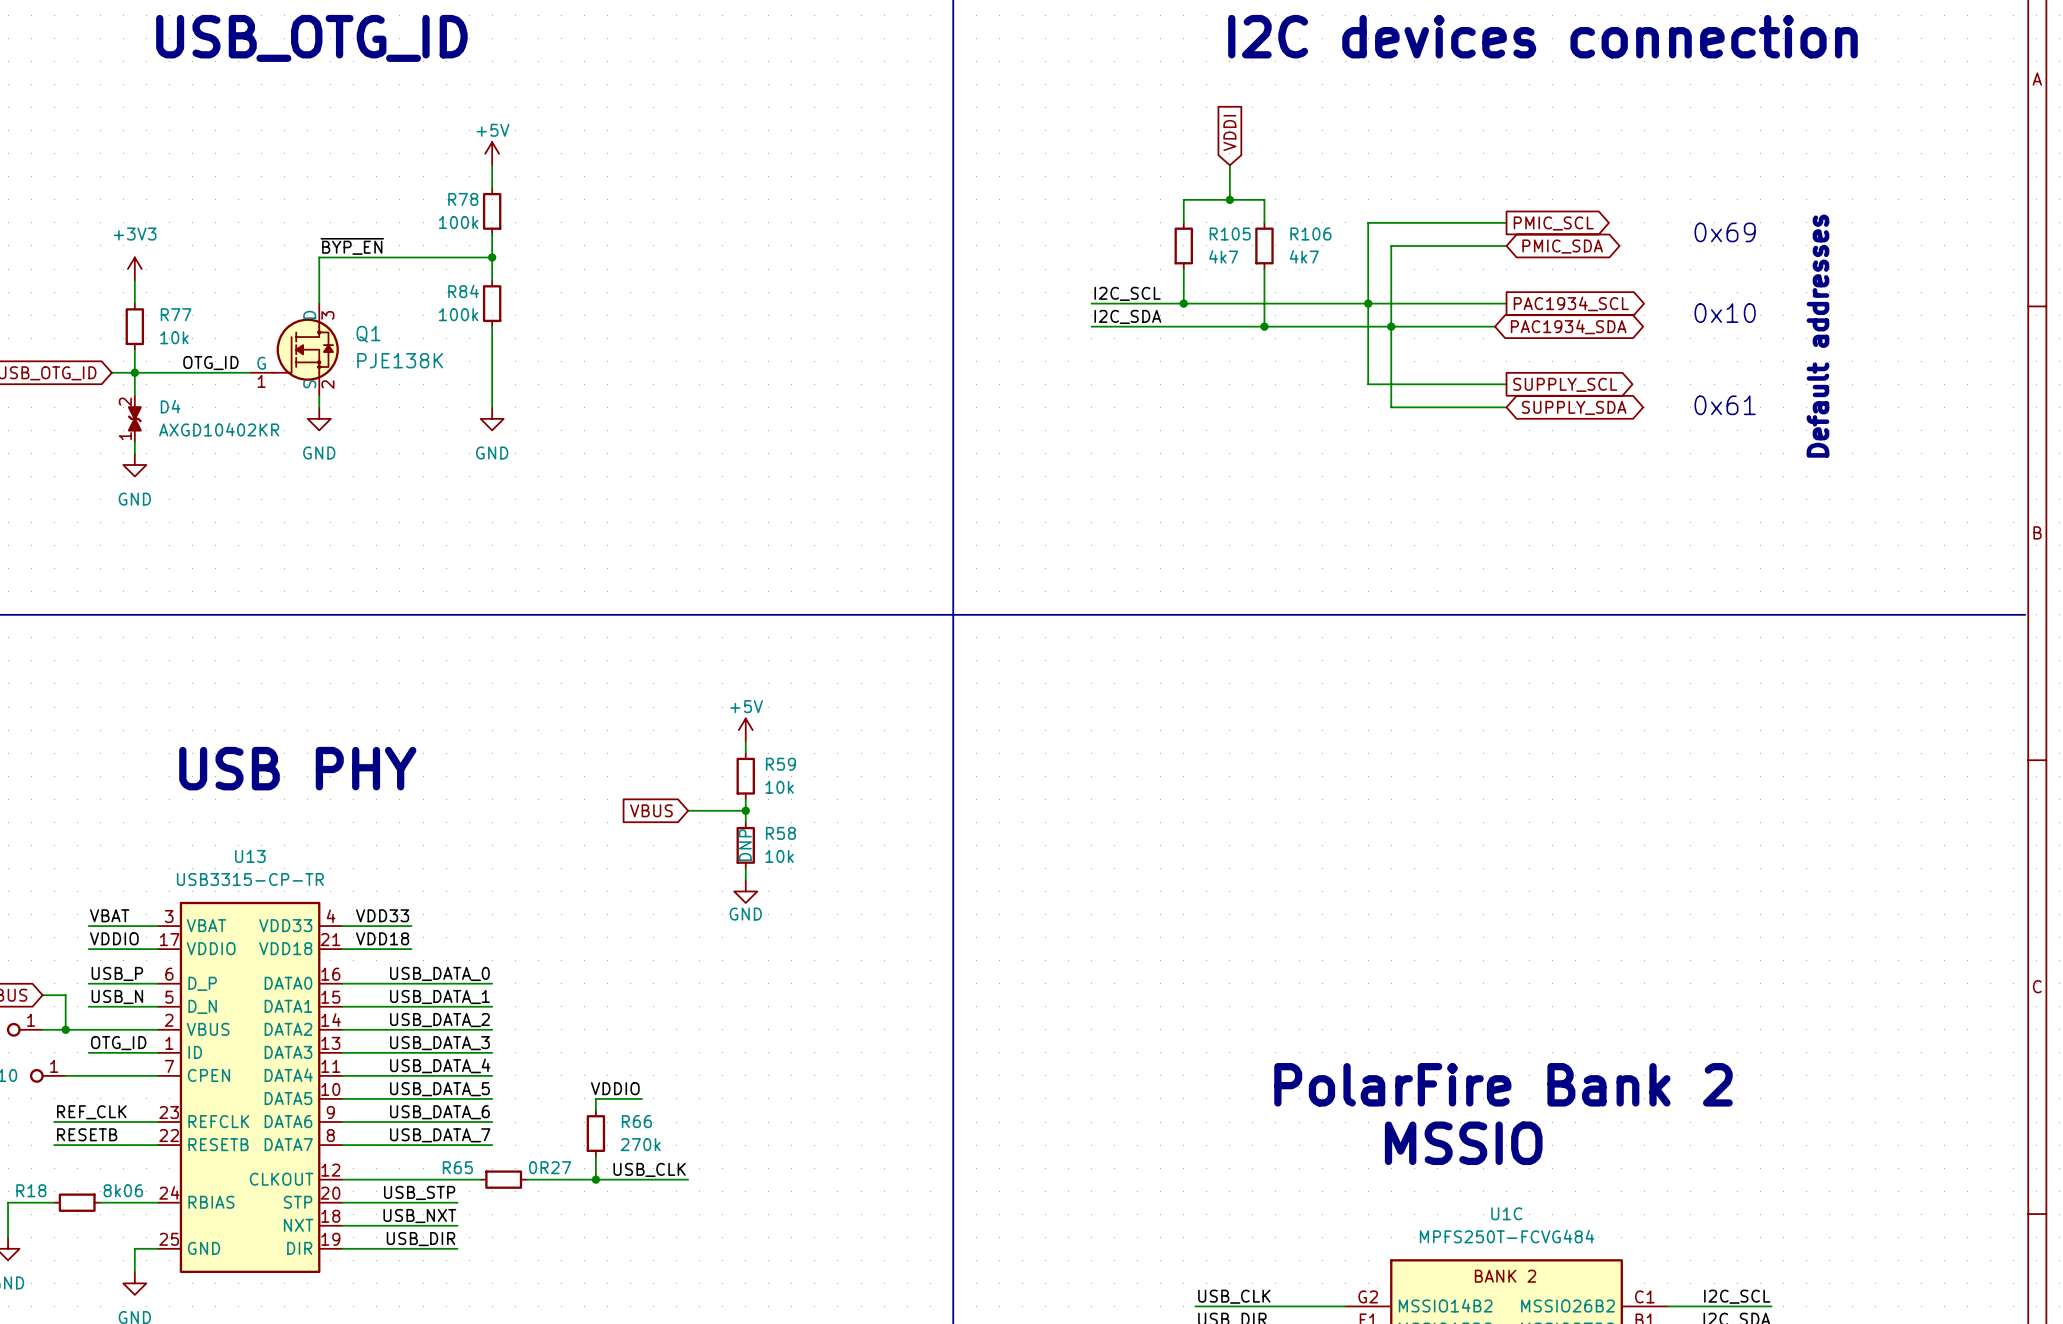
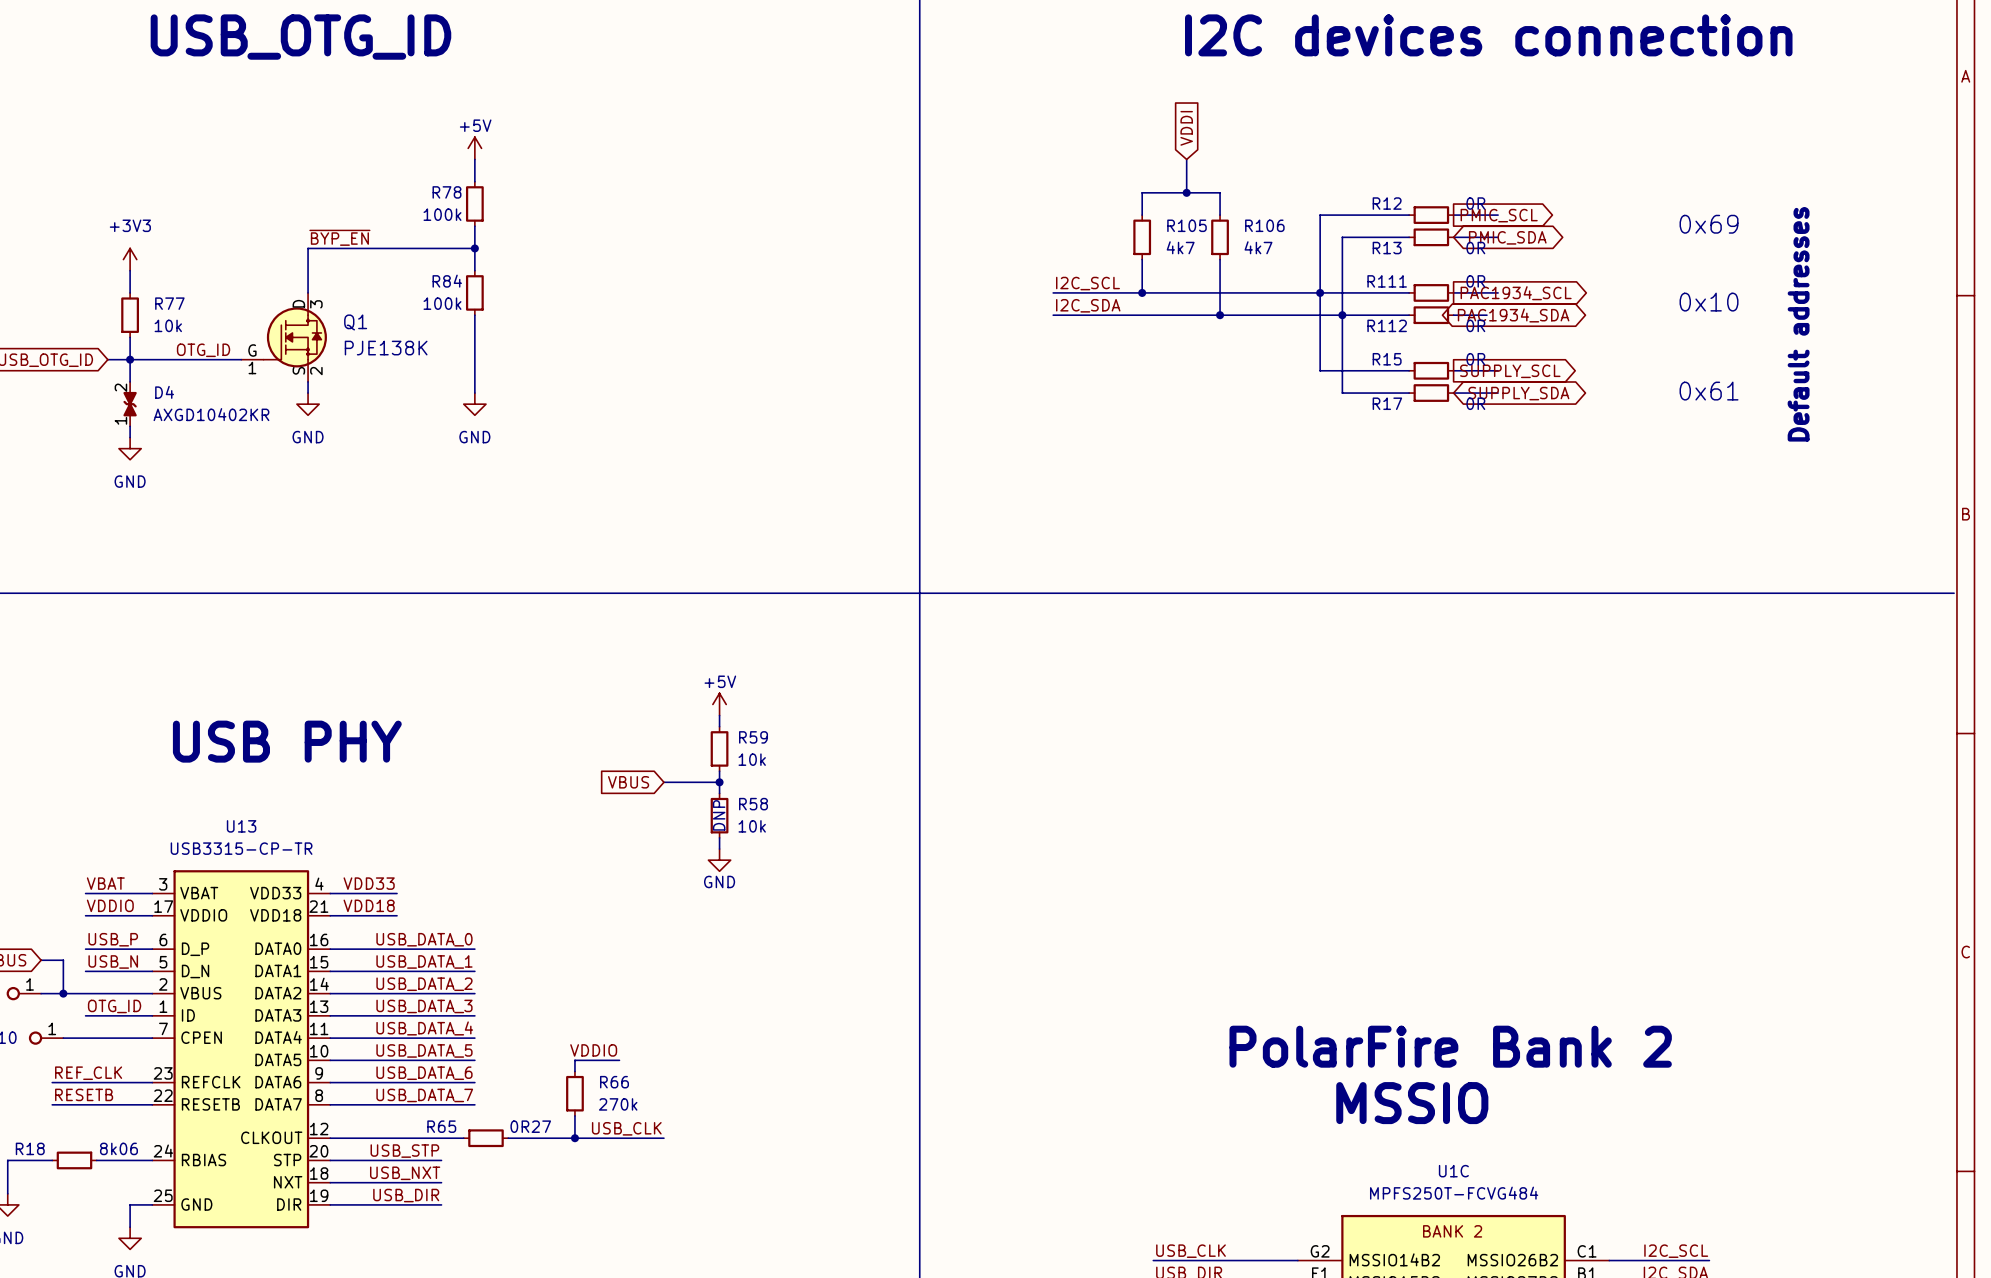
wire: (1460, 222) (1506, 222) -> (1498, 215) (1453, 215)
R12: none -> (1431, 215)
text position: 0x69 (1725, 232) -> 0x69 (1709, 224)
wire: (1460, 245) (1506, 245) -> (1498, 237) (1453, 237)
R13: none -> (1431, 237)
wire: (1460, 303) (1506, 303) -> (1498, 292) (1453, 292)
R111: none -> (1431, 292)
text position: 0x10 (1725, 313) -> 0x10 (1709, 302)
wire: (1460, 326) (1494, 326) -> (1453, 315) (1486, 315)
R112: none -> (1431, 315)
text position: Default addresses (1817, 336) -> Default addresses (1798, 324)
wire: (1460, 384) (1506, 384) -> (1498, 370) (1453, 370)
R15: none -> (1431, 370)
text position: 0x61 (1725, 405) -> 0x61 (1709, 391)
wire: (1460, 407) (1506, 407) -> (1498, 393) (1453, 393)
R17: none -> (1431, 393)

